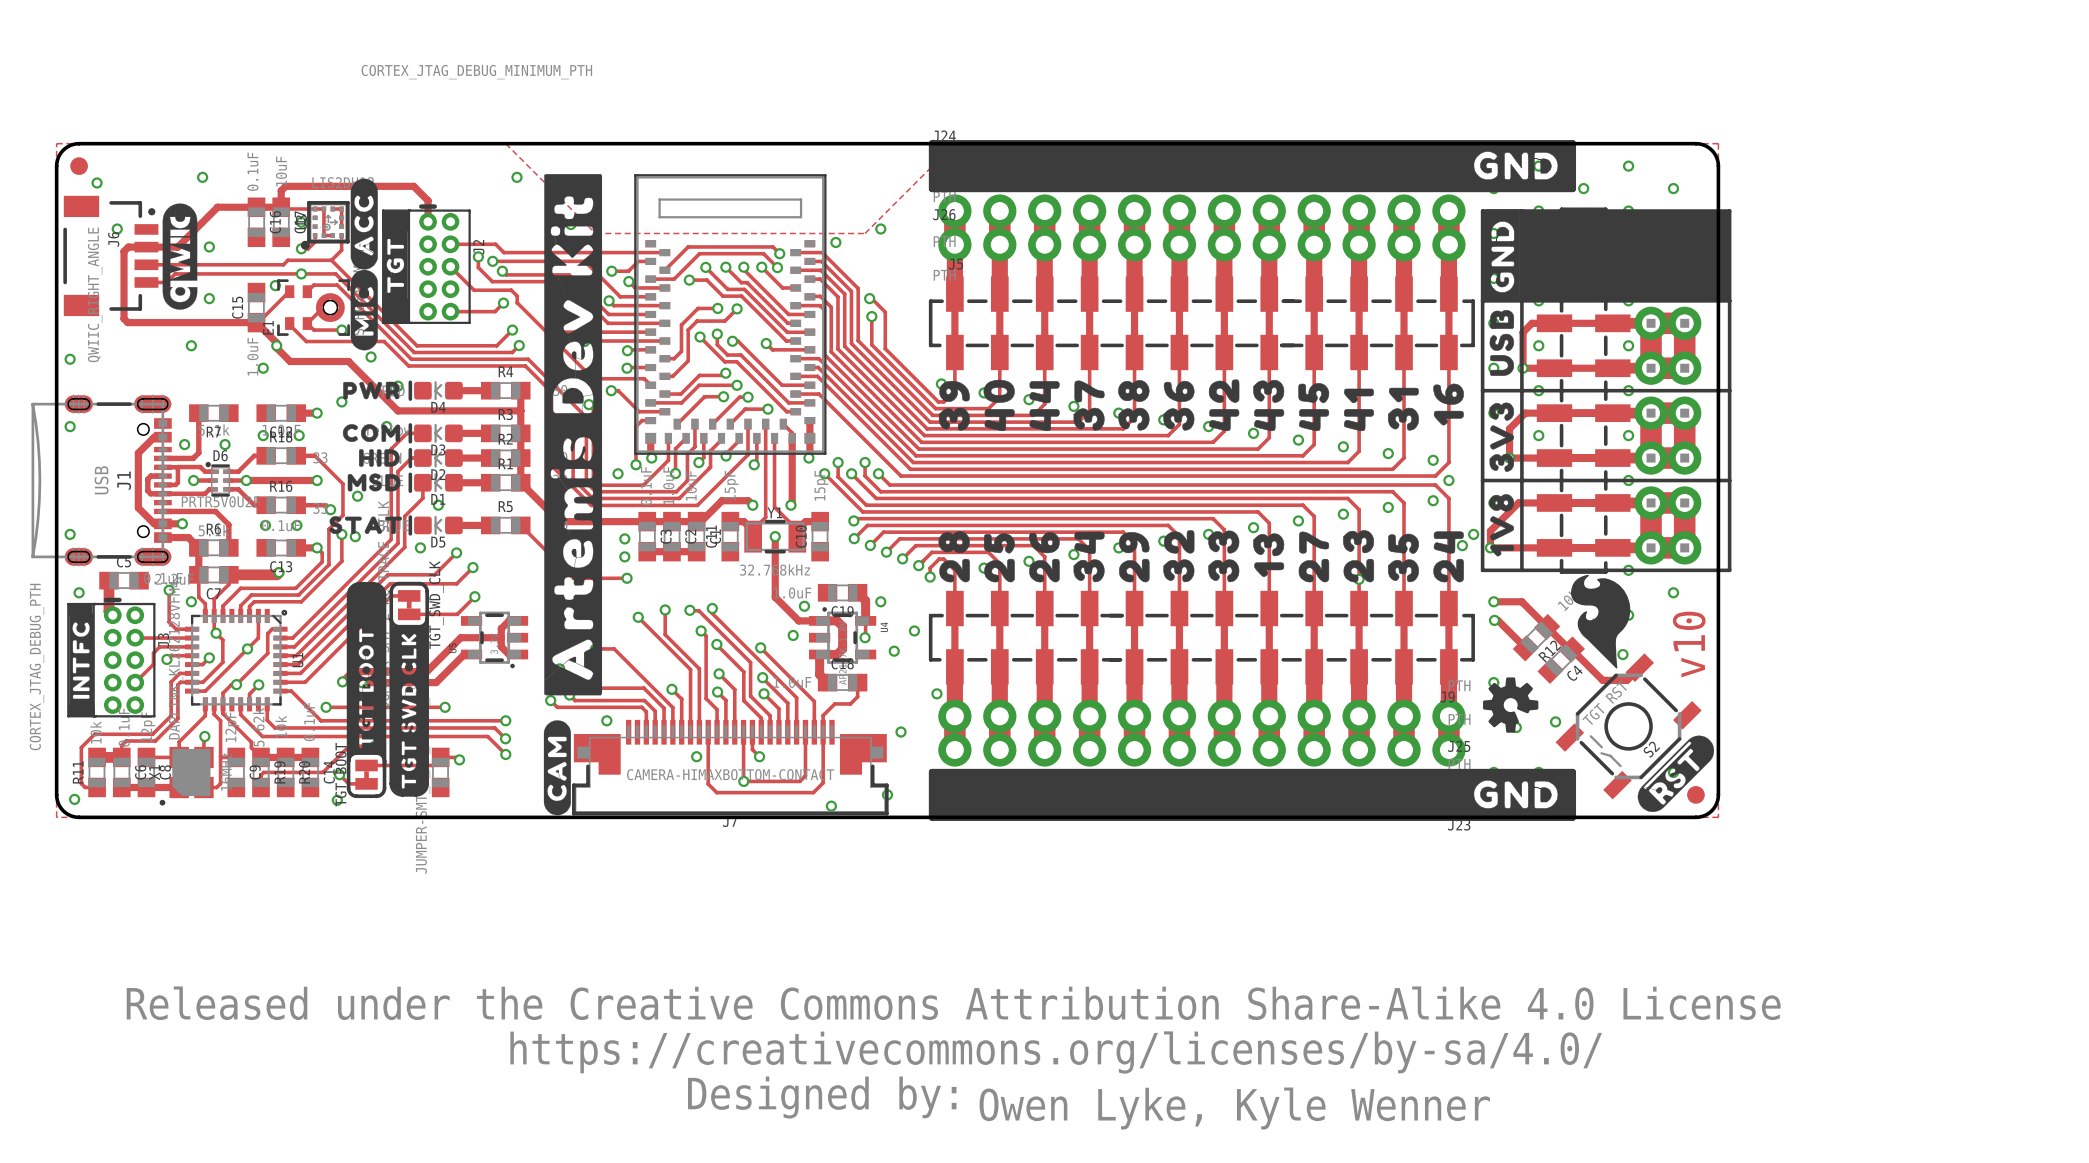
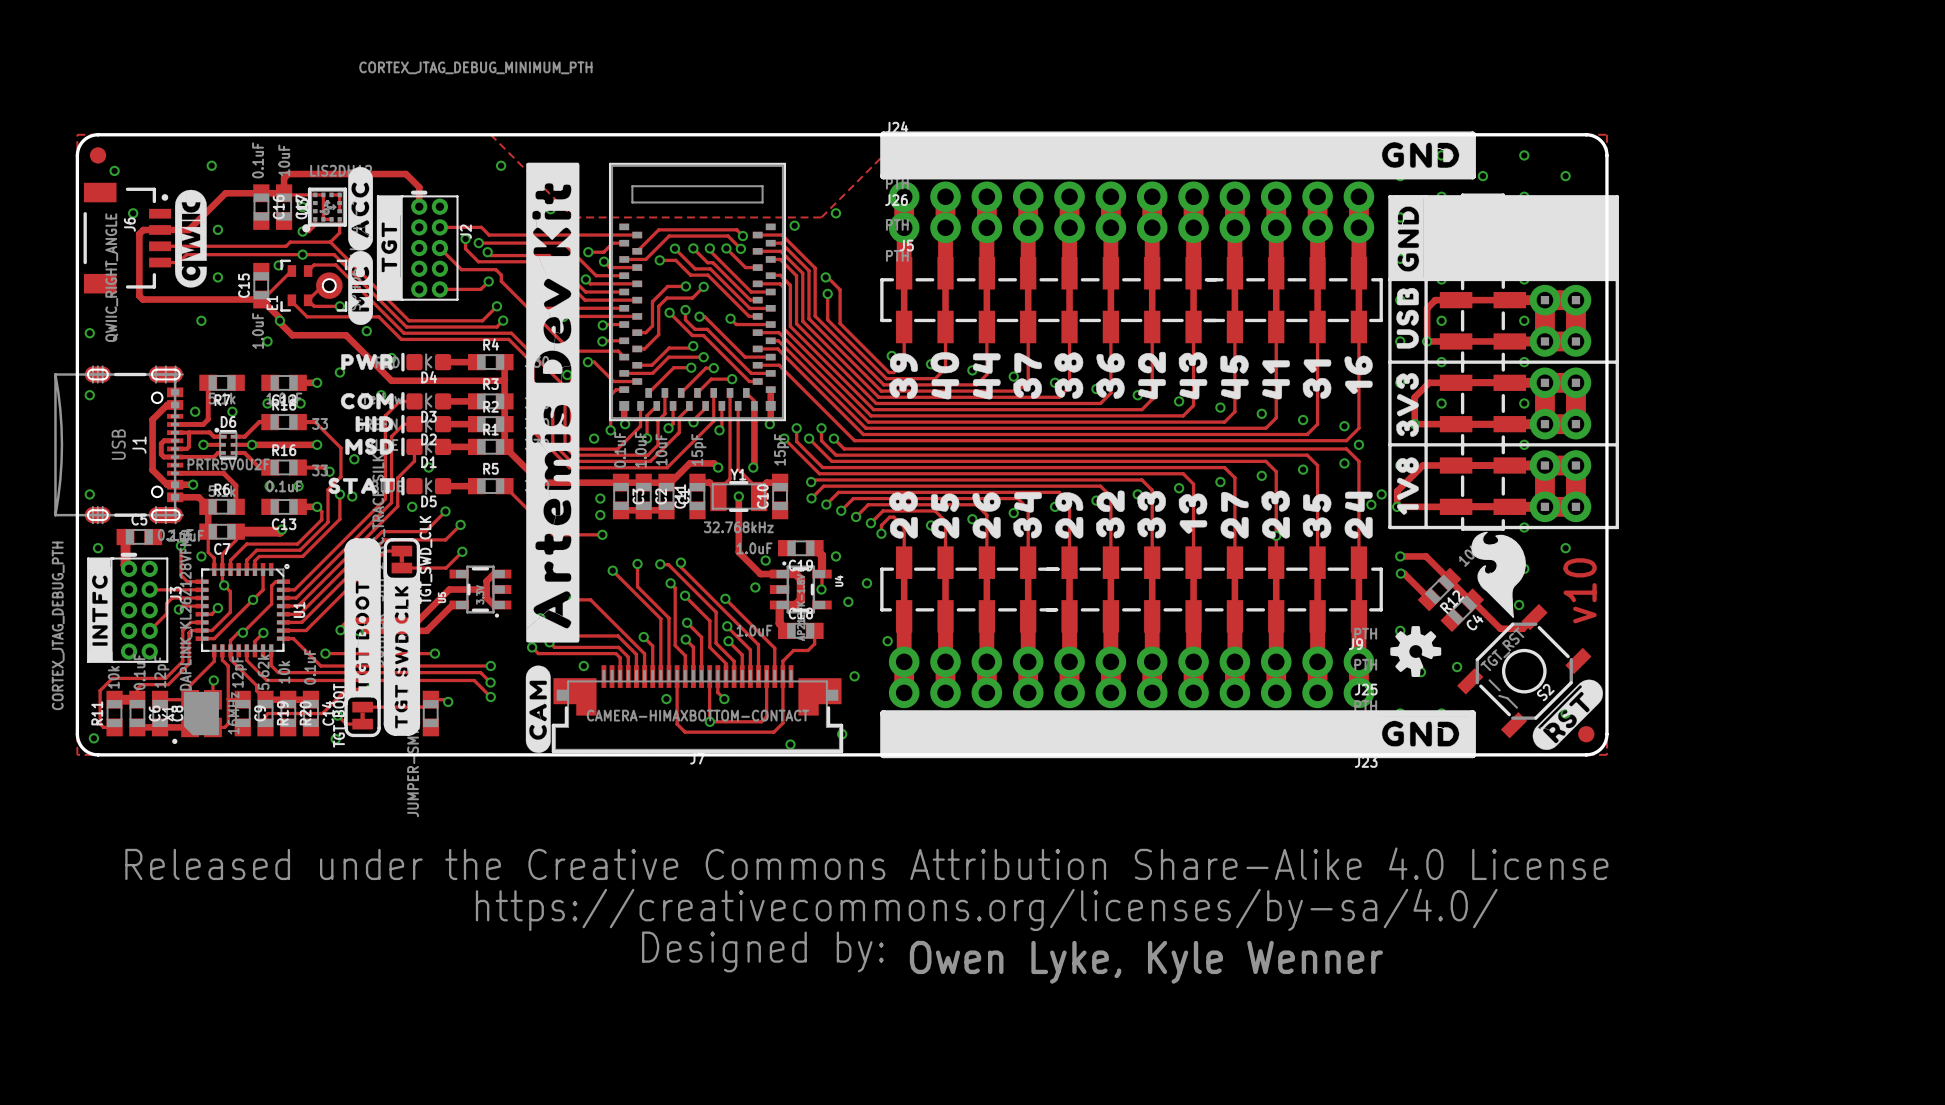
drawing position: (953, 1052) -> (866, 909)
text position: Owen Lyke, Kyle Wenner (1234, 1108) -> Owen Lyke, Kyle Wenner (1146, 962)

